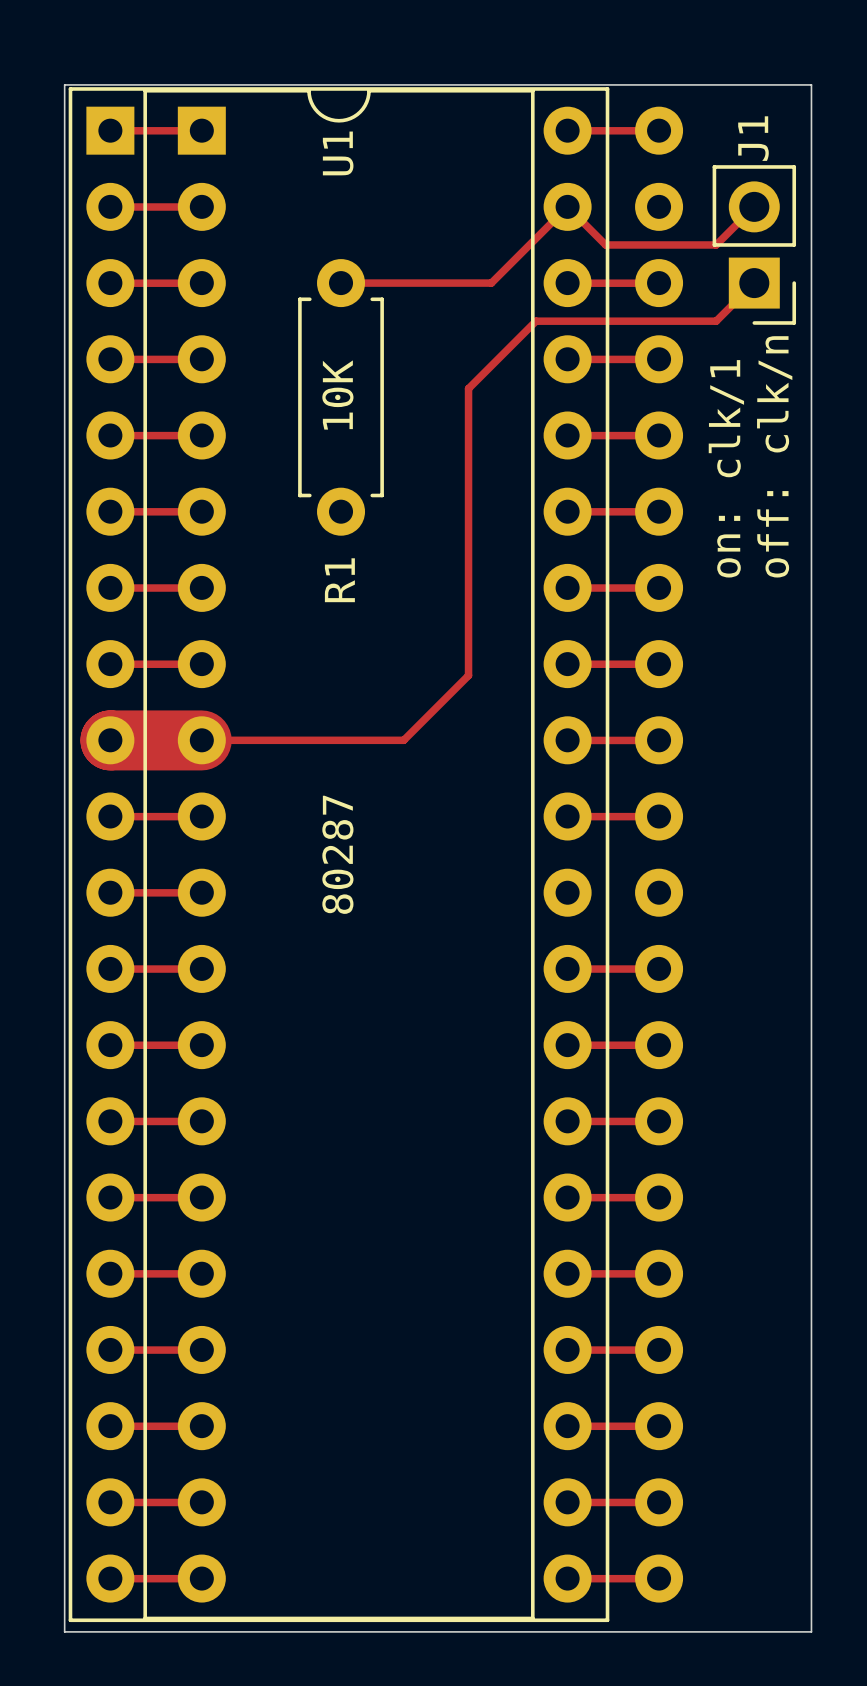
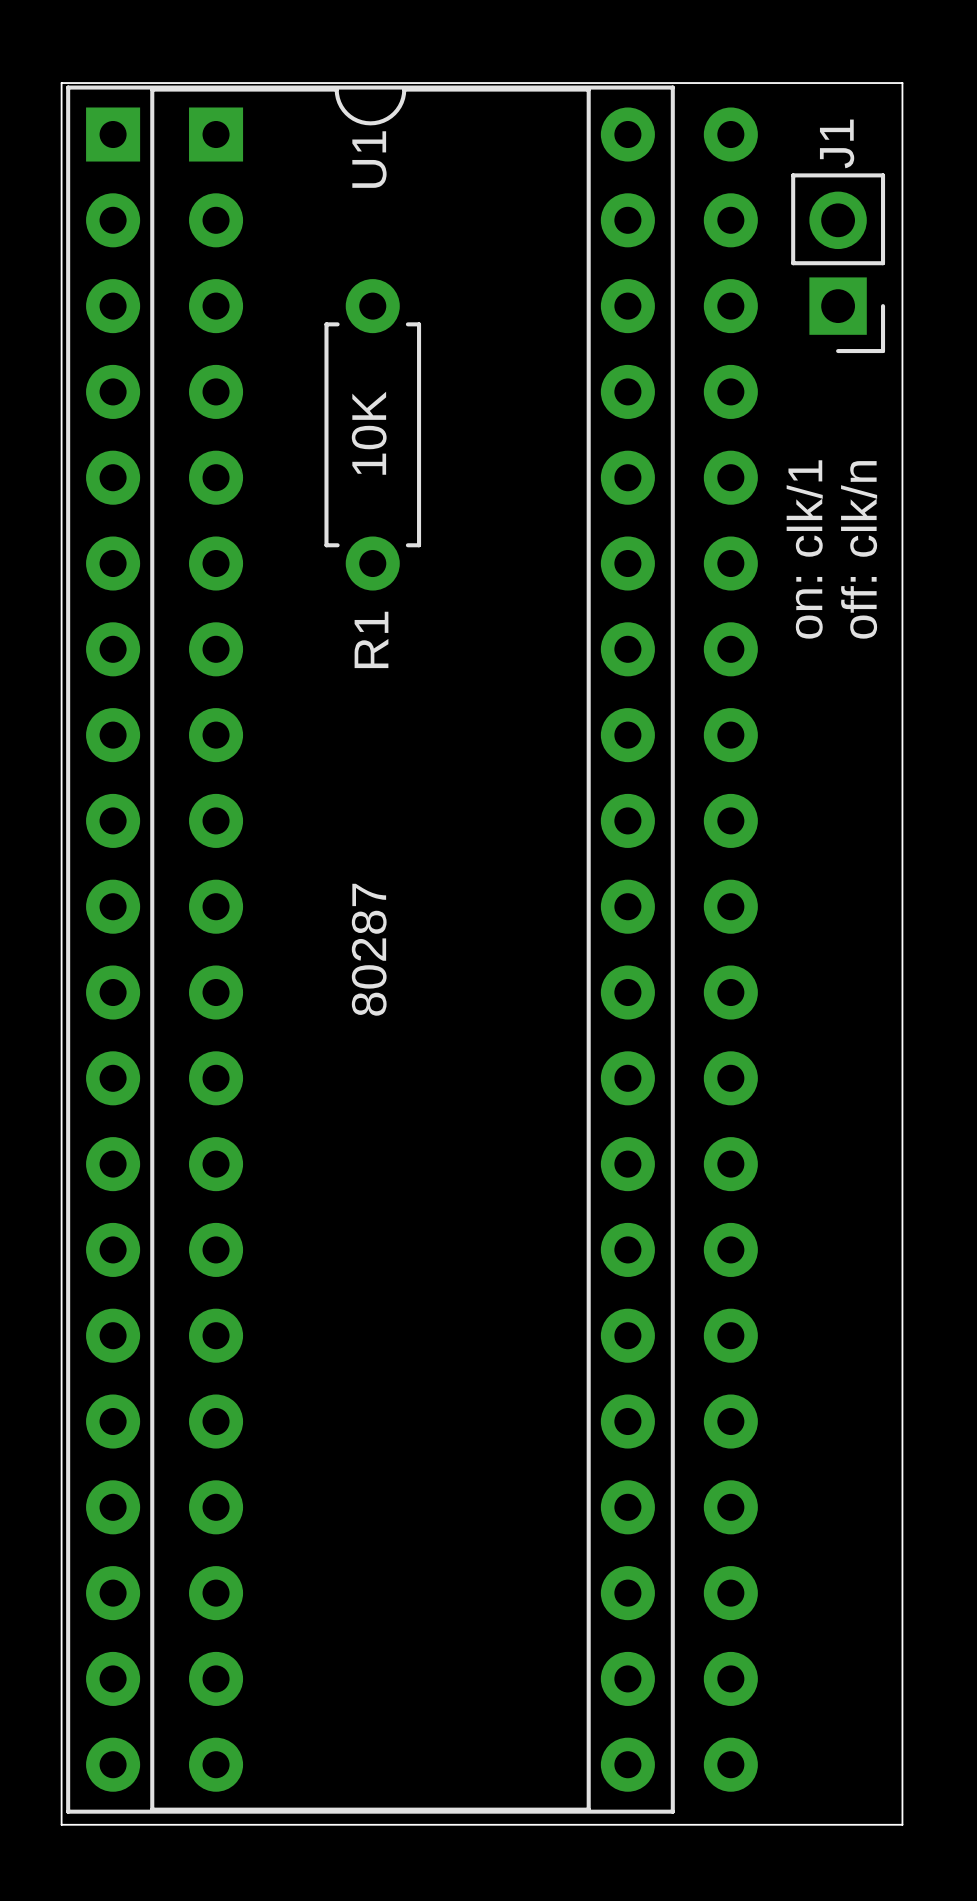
track: (106, 130) (201, 130) -> none
track: (563, 130) (658, 130) -> none
track: (106, 206) (201, 206) -> none
track: (754, 206) (716, 244) (605, 244) (567, 206) (491, 283) (341, 283) -> none
track: (106, 283) (201, 283) -> none
track: (563, 283) (658, 283) -> none
track: (754, 283) (716, 321) (536, 321) (468, 388) (468, 675) (403, 740) (110, 740) -> none
track: (106, 359) (201, 359) -> none
track: (563, 359) (658, 359) -> none
track: (106, 435) (201, 435) -> none
track: (563, 435) (658, 435) -> none
track: (106, 511) (201, 511) -> none
track: (563, 511) (658, 511) -> none
track: (106, 588) (201, 588) -> none
track: (563, 588) (658, 588) -> none
track: (106, 664) (201, 664) -> none
track: (563, 664) (658, 664) -> none
track: (563, 740) (658, 740) -> none
track: (106, 816) (201, 816) -> none
track: (563, 816) (658, 816) -> none
track: (106, 892) (201, 892) -> none
track: (106, 969) (201, 969) -> none
track: (563, 969) (658, 969) -> none
track: (106, 1045) (201, 1045) -> none
track: (563, 1045) (658, 1045) -> none
track: (106, 1121) (201, 1121) -> none
track: (563, 1121) (658, 1121) -> none
track: (106, 1197) (201, 1197) -> none
track: (563, 1197) (658, 1197) -> none
track: (106, 1273) (201, 1273) -> none
track: (563, 1273) (658, 1273) -> none
track: (106, 1350) (201, 1350) -> none
track: (563, 1350) (658, 1350) -> none
track: (106, 1426) (201, 1426) -> none
track: (563, 1426) (658, 1426) -> none
track: (106, 1502) (201, 1502) -> none
track: (563, 1502) (658, 1502) -> none
track: (106, 1578) (201, 1578) -> none
track: (563, 1578) (658, 1578) -> none

